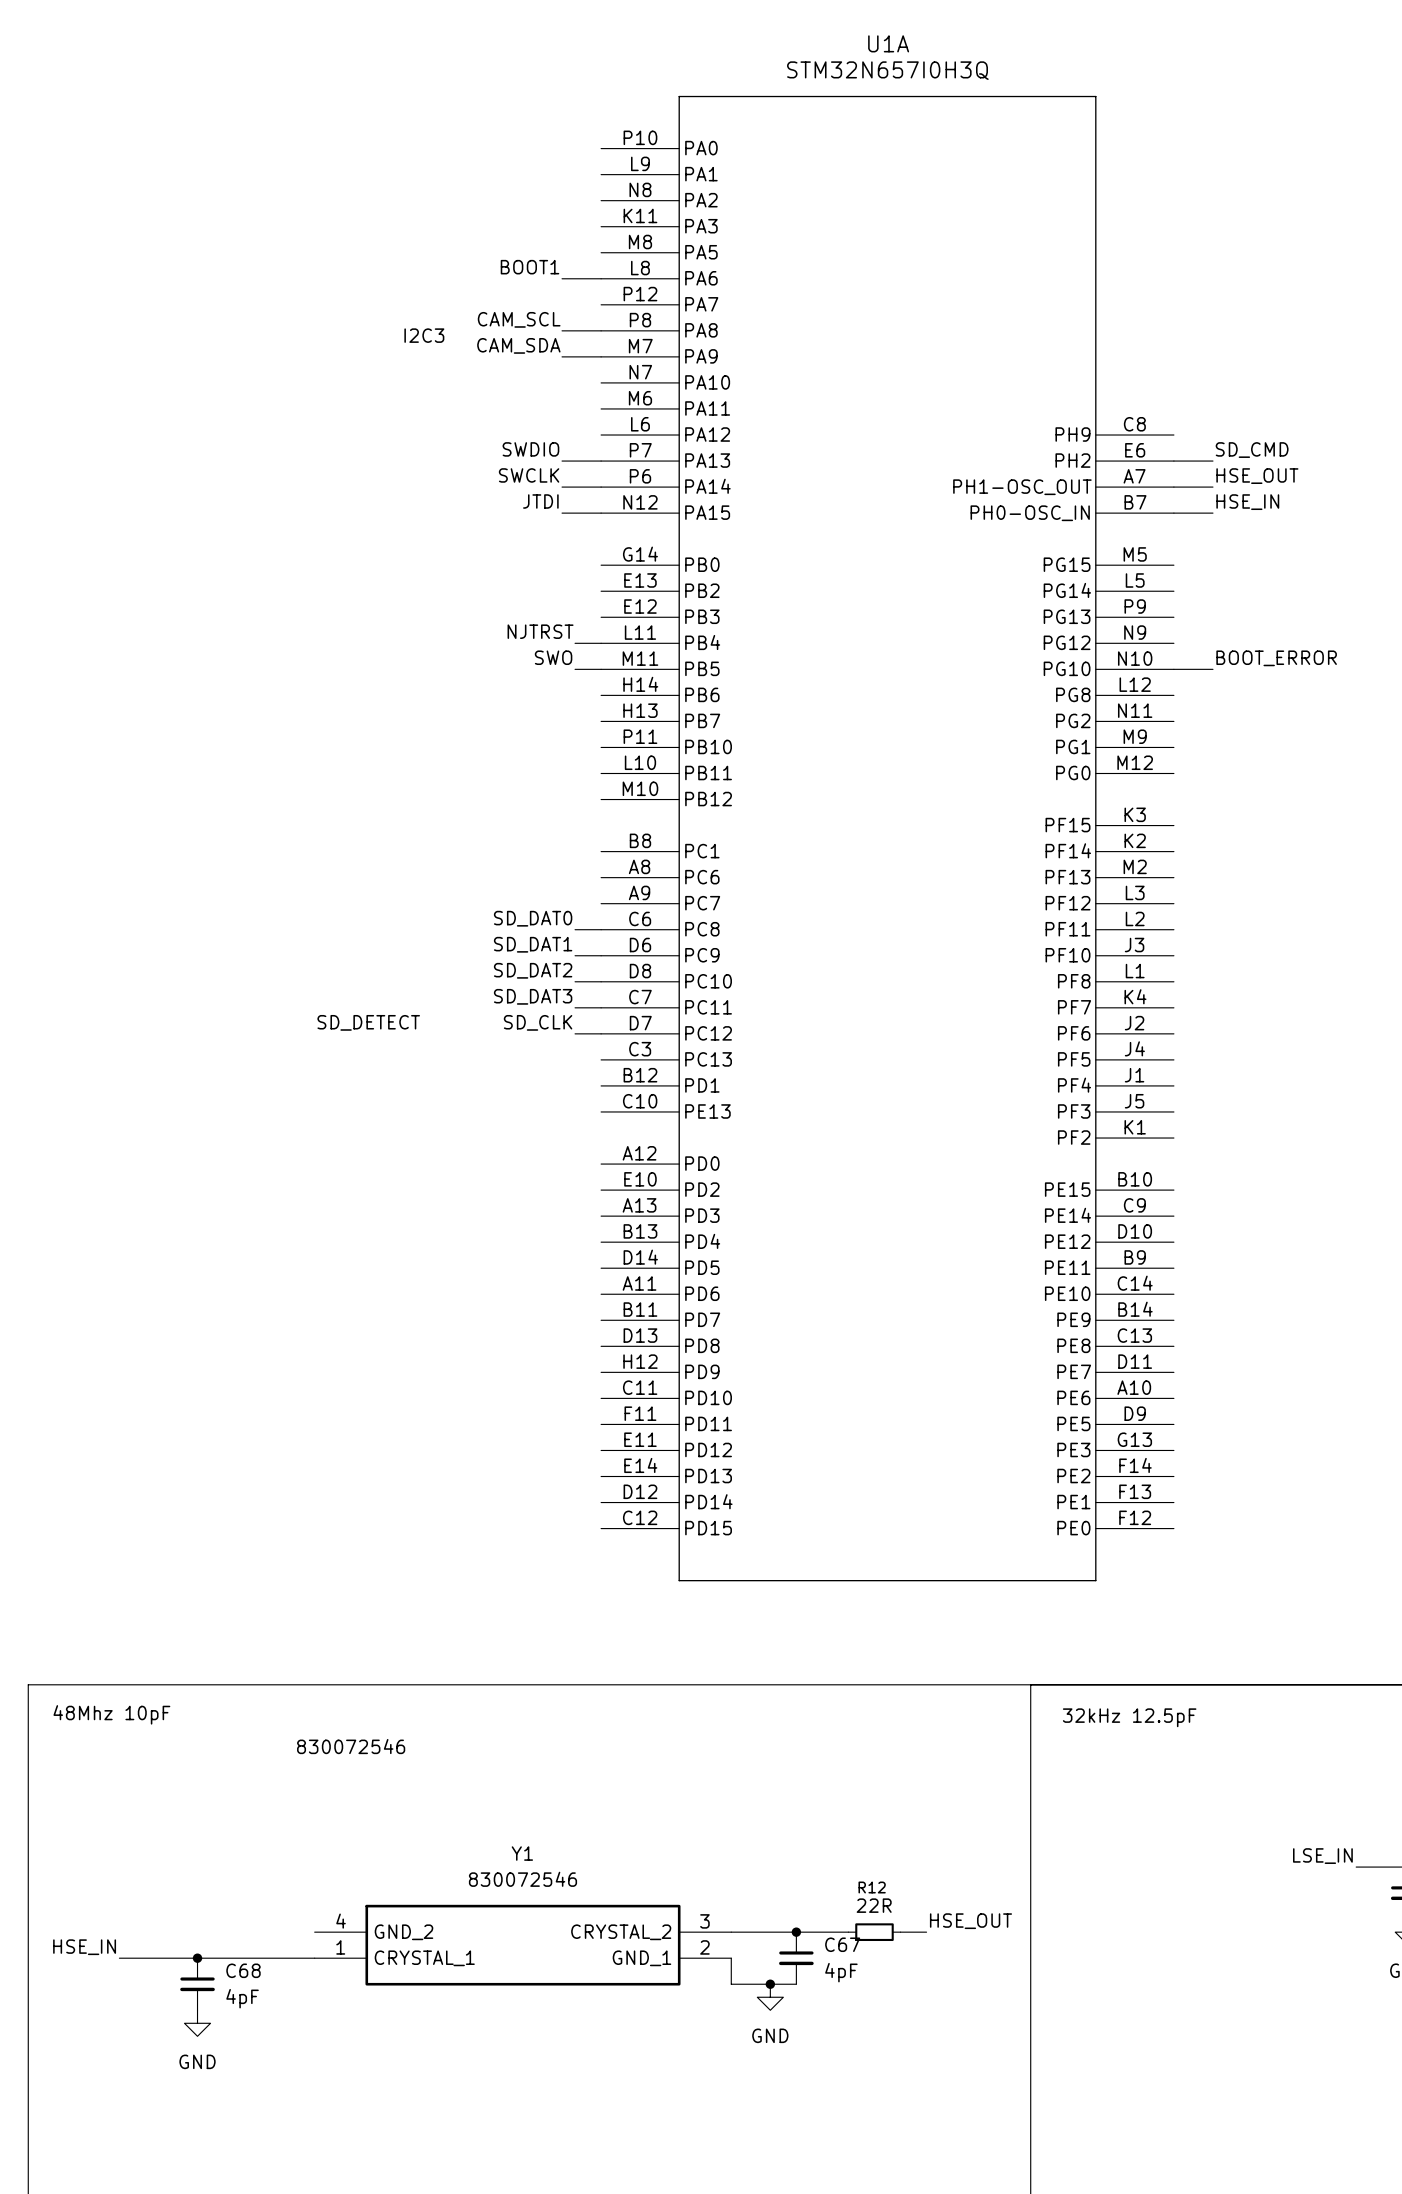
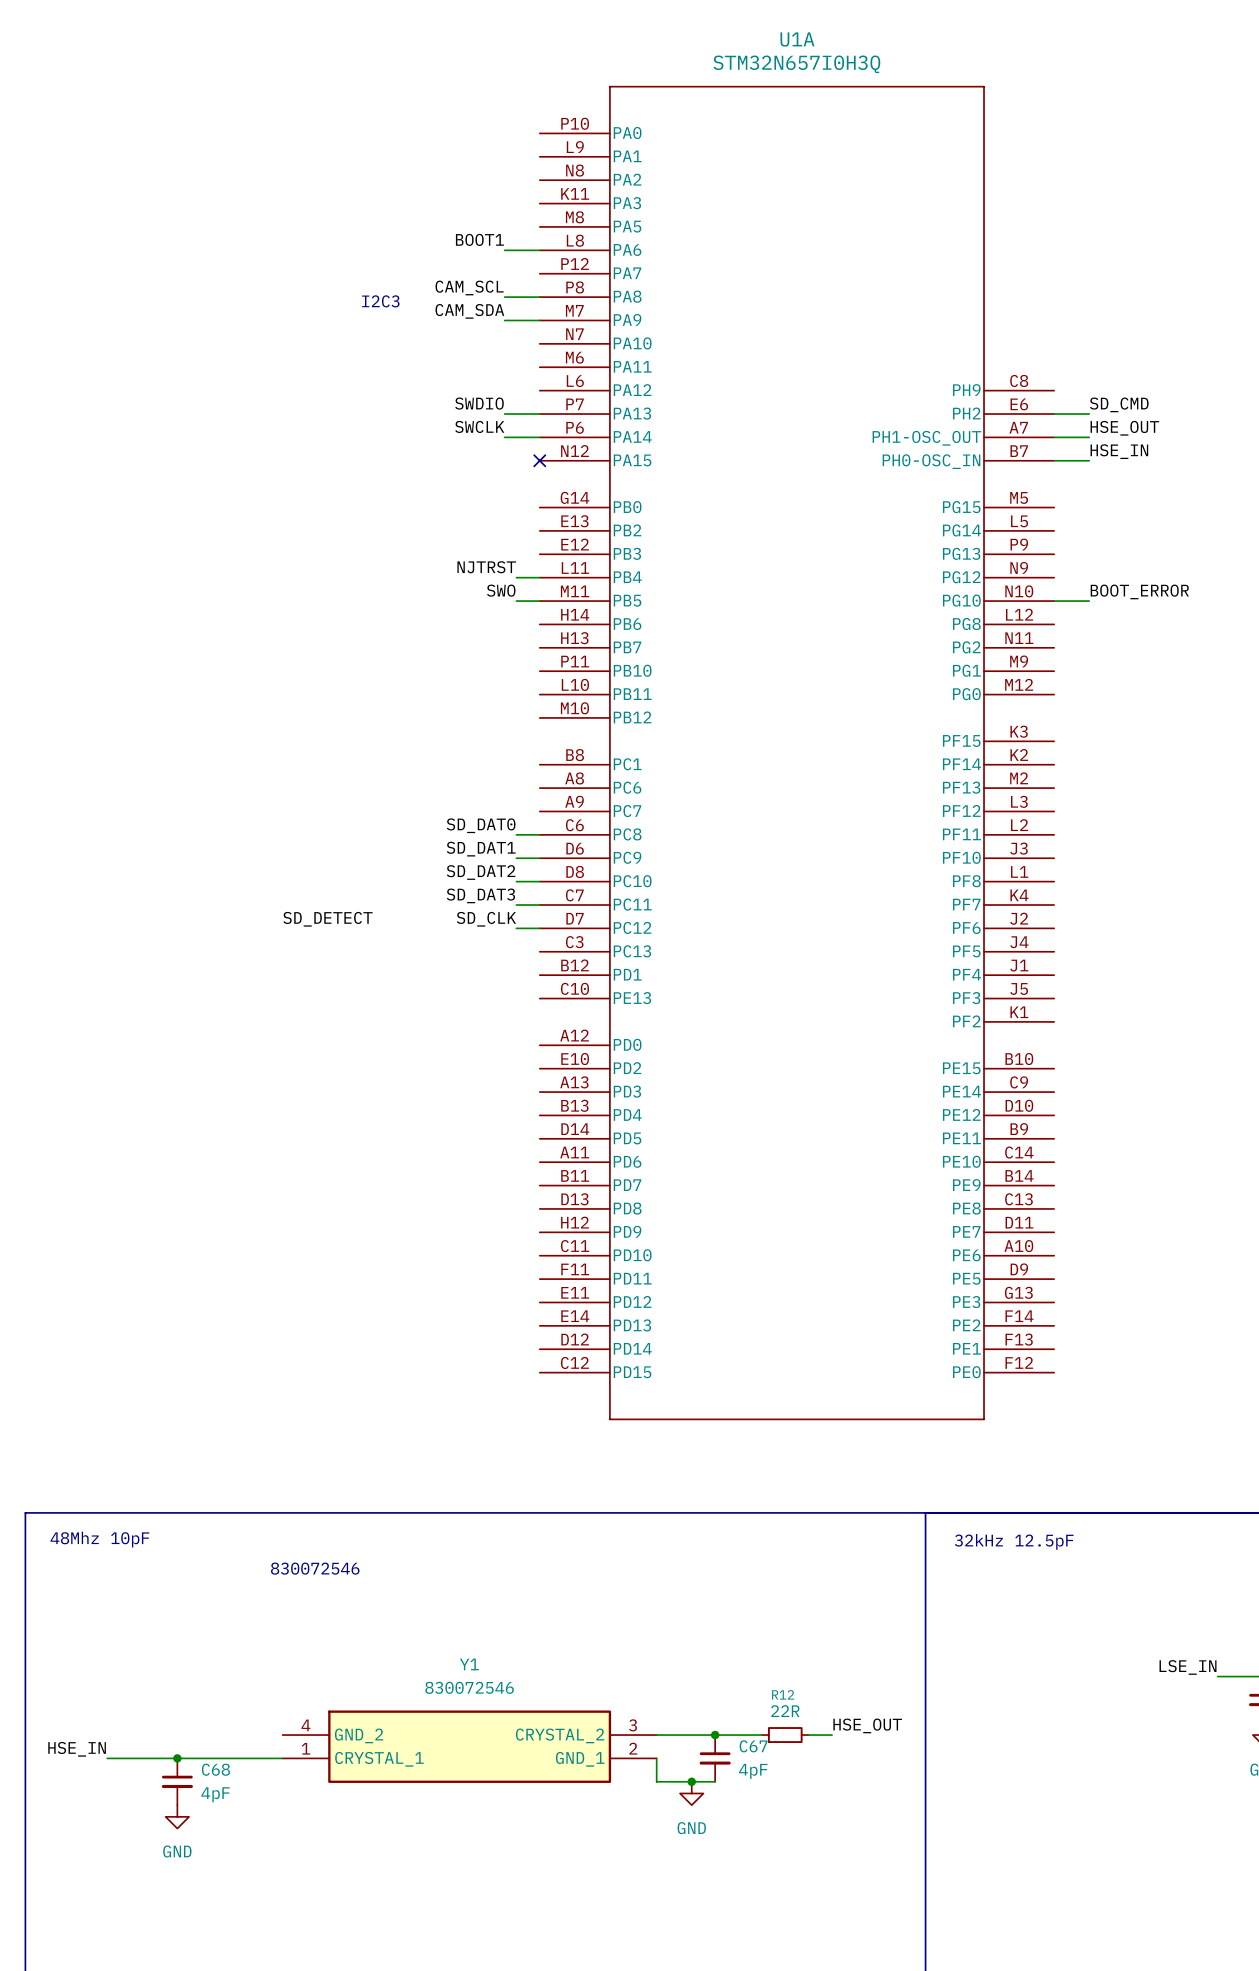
label: JTDI (540, 501) -> none
wire: (562, 513) (601, 513) -> none
no-connect mark: none -> (539, 460)

